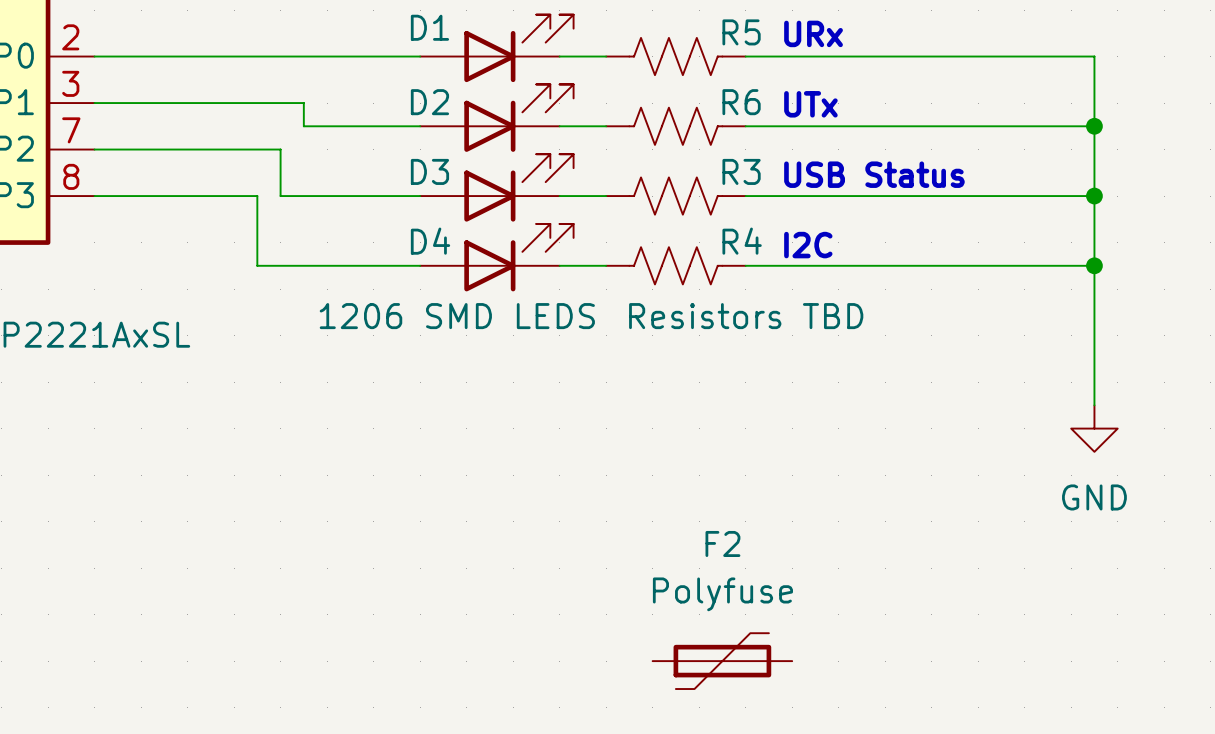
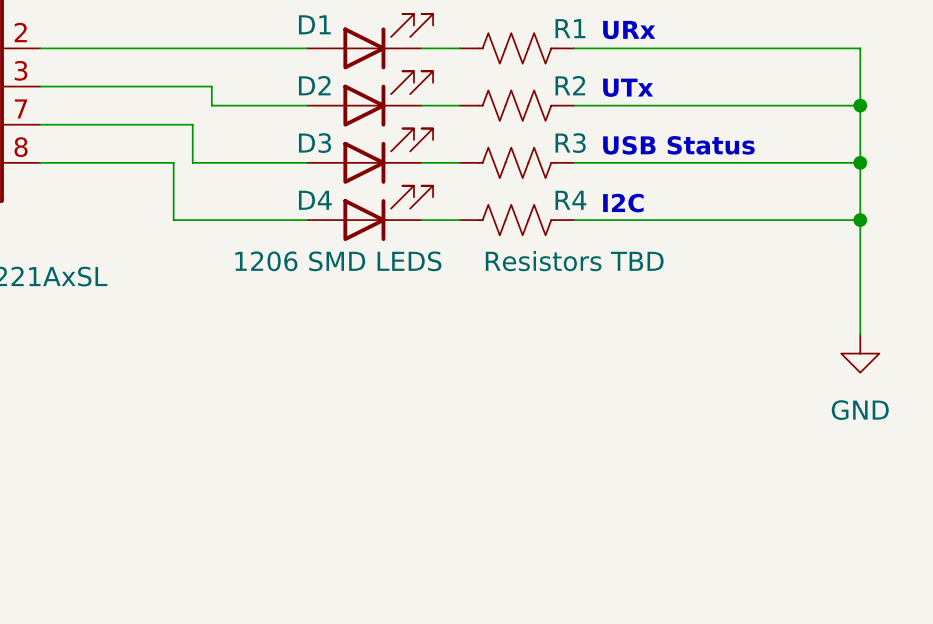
R5 name: R5 (741, 32) -> R1 (570, 28)
R6 name: R6 (741, 102) -> R2 (570, 85)
F2: Polyfuse (722, 661) -> none

